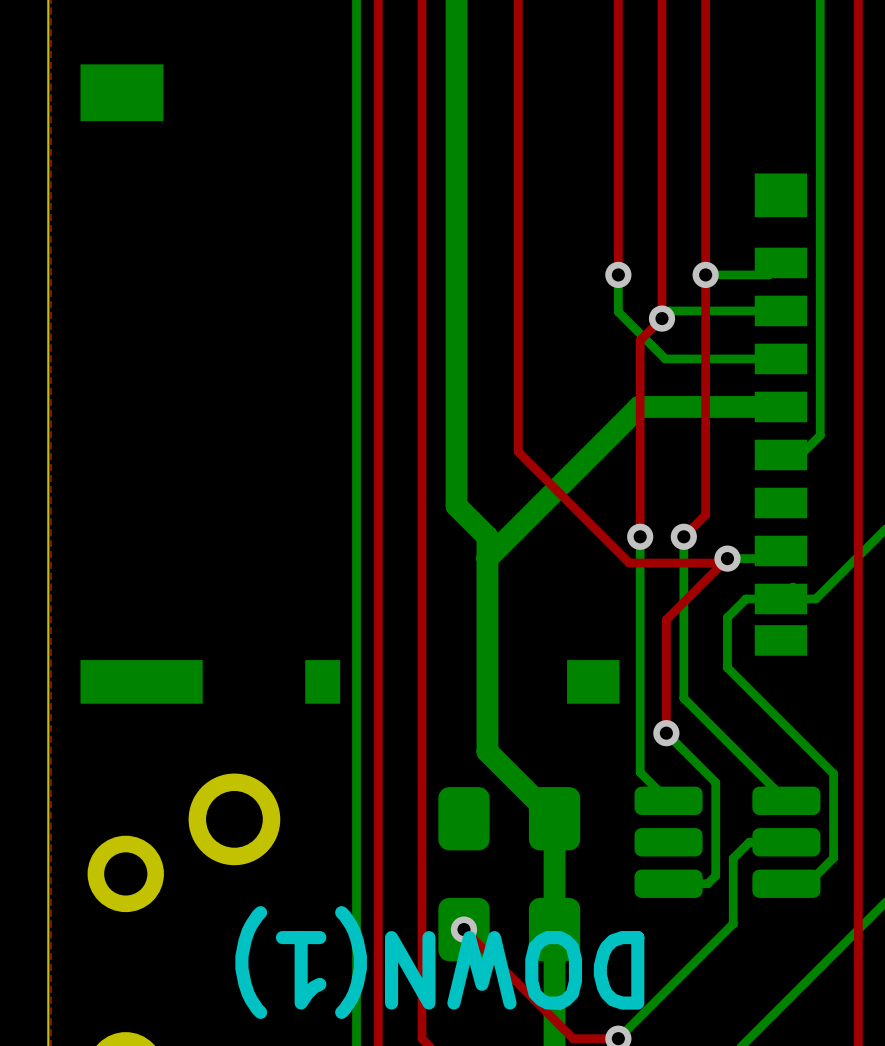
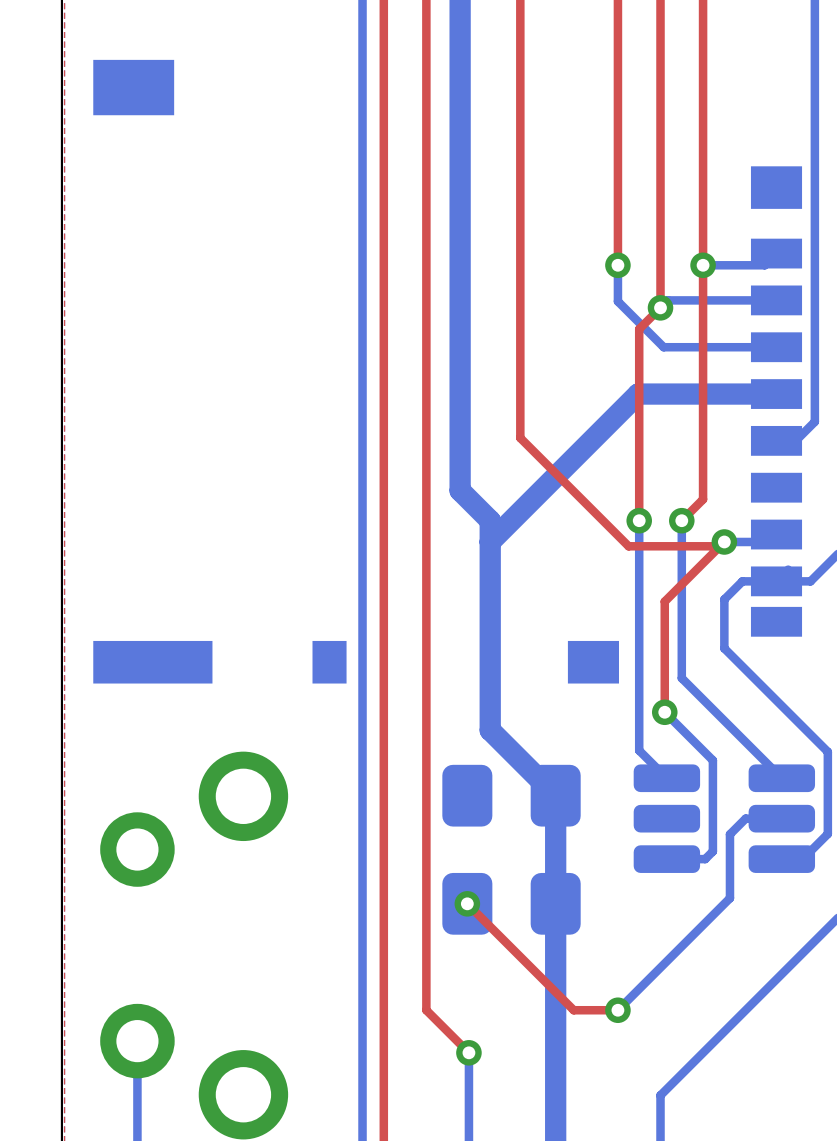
text: DOWN(1) (439, 962) -> none

